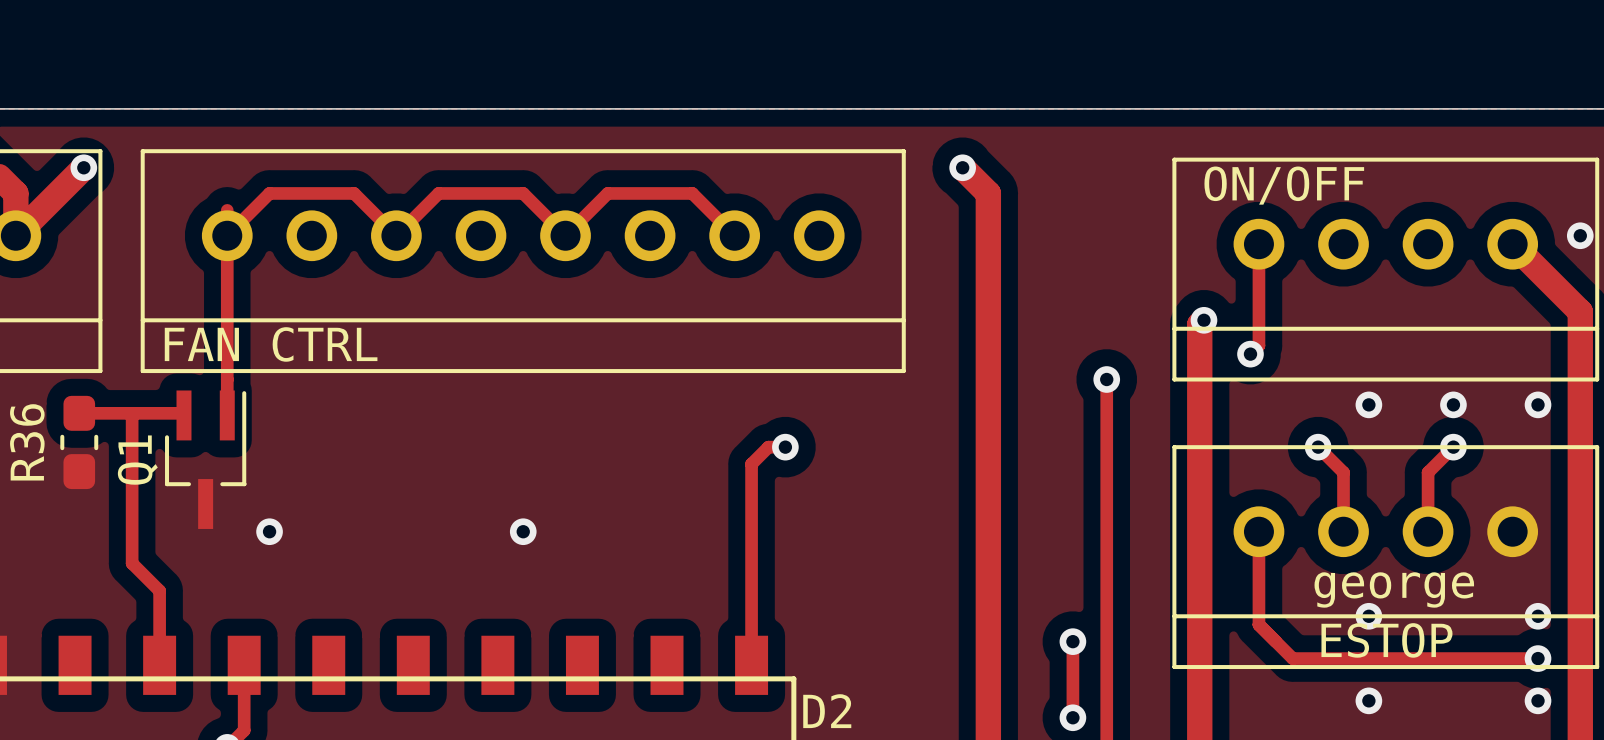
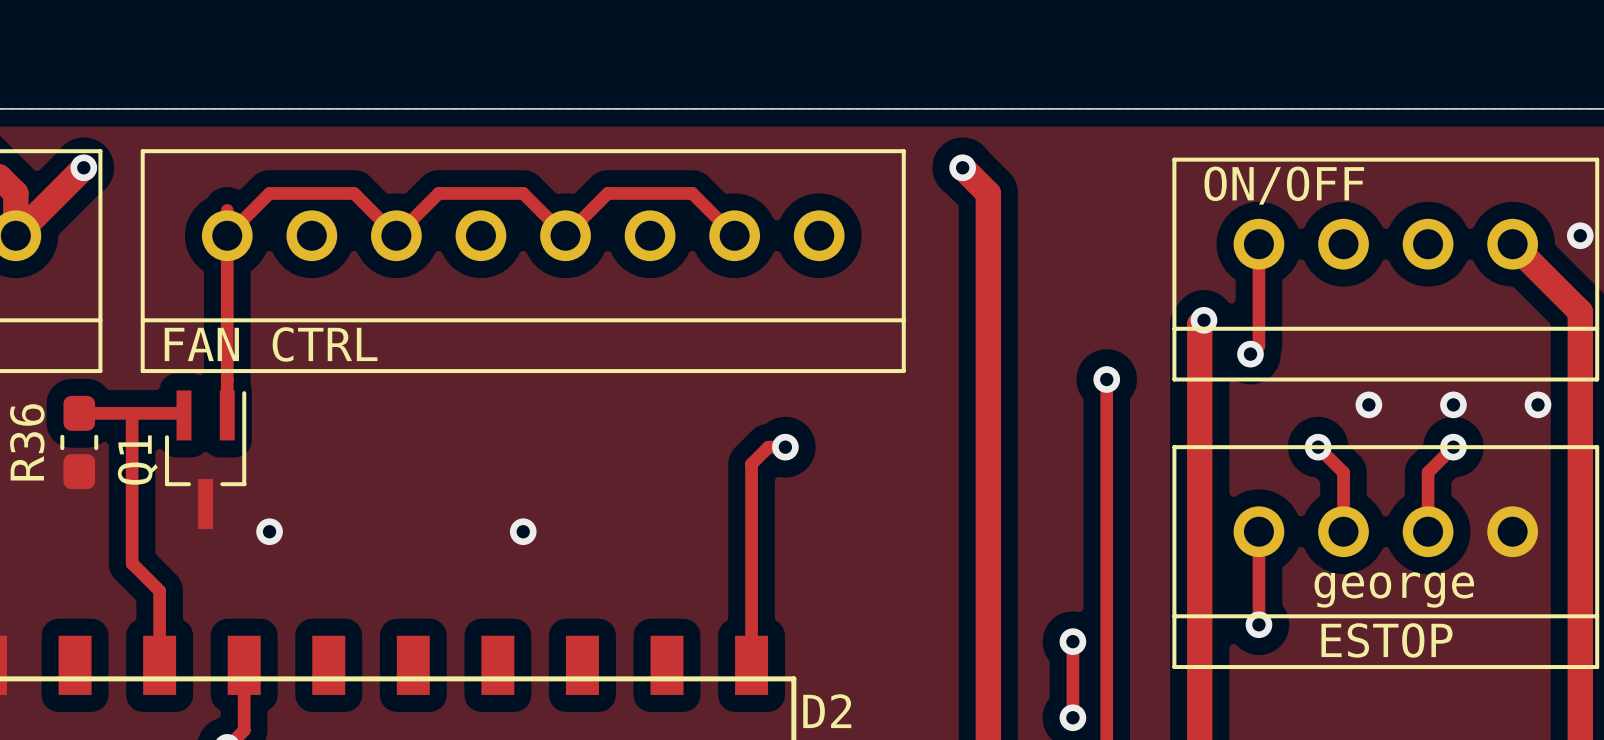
via: (1368, 616) -> none
via: (1538, 616) -> none
track: (1258, 624) (1292, 658) (1538, 658) -> none
via: none -> (1258, 624)
via: (1538, 658) -> none
via: (1368, 700) -> none
via: (1538, 700) -> none

